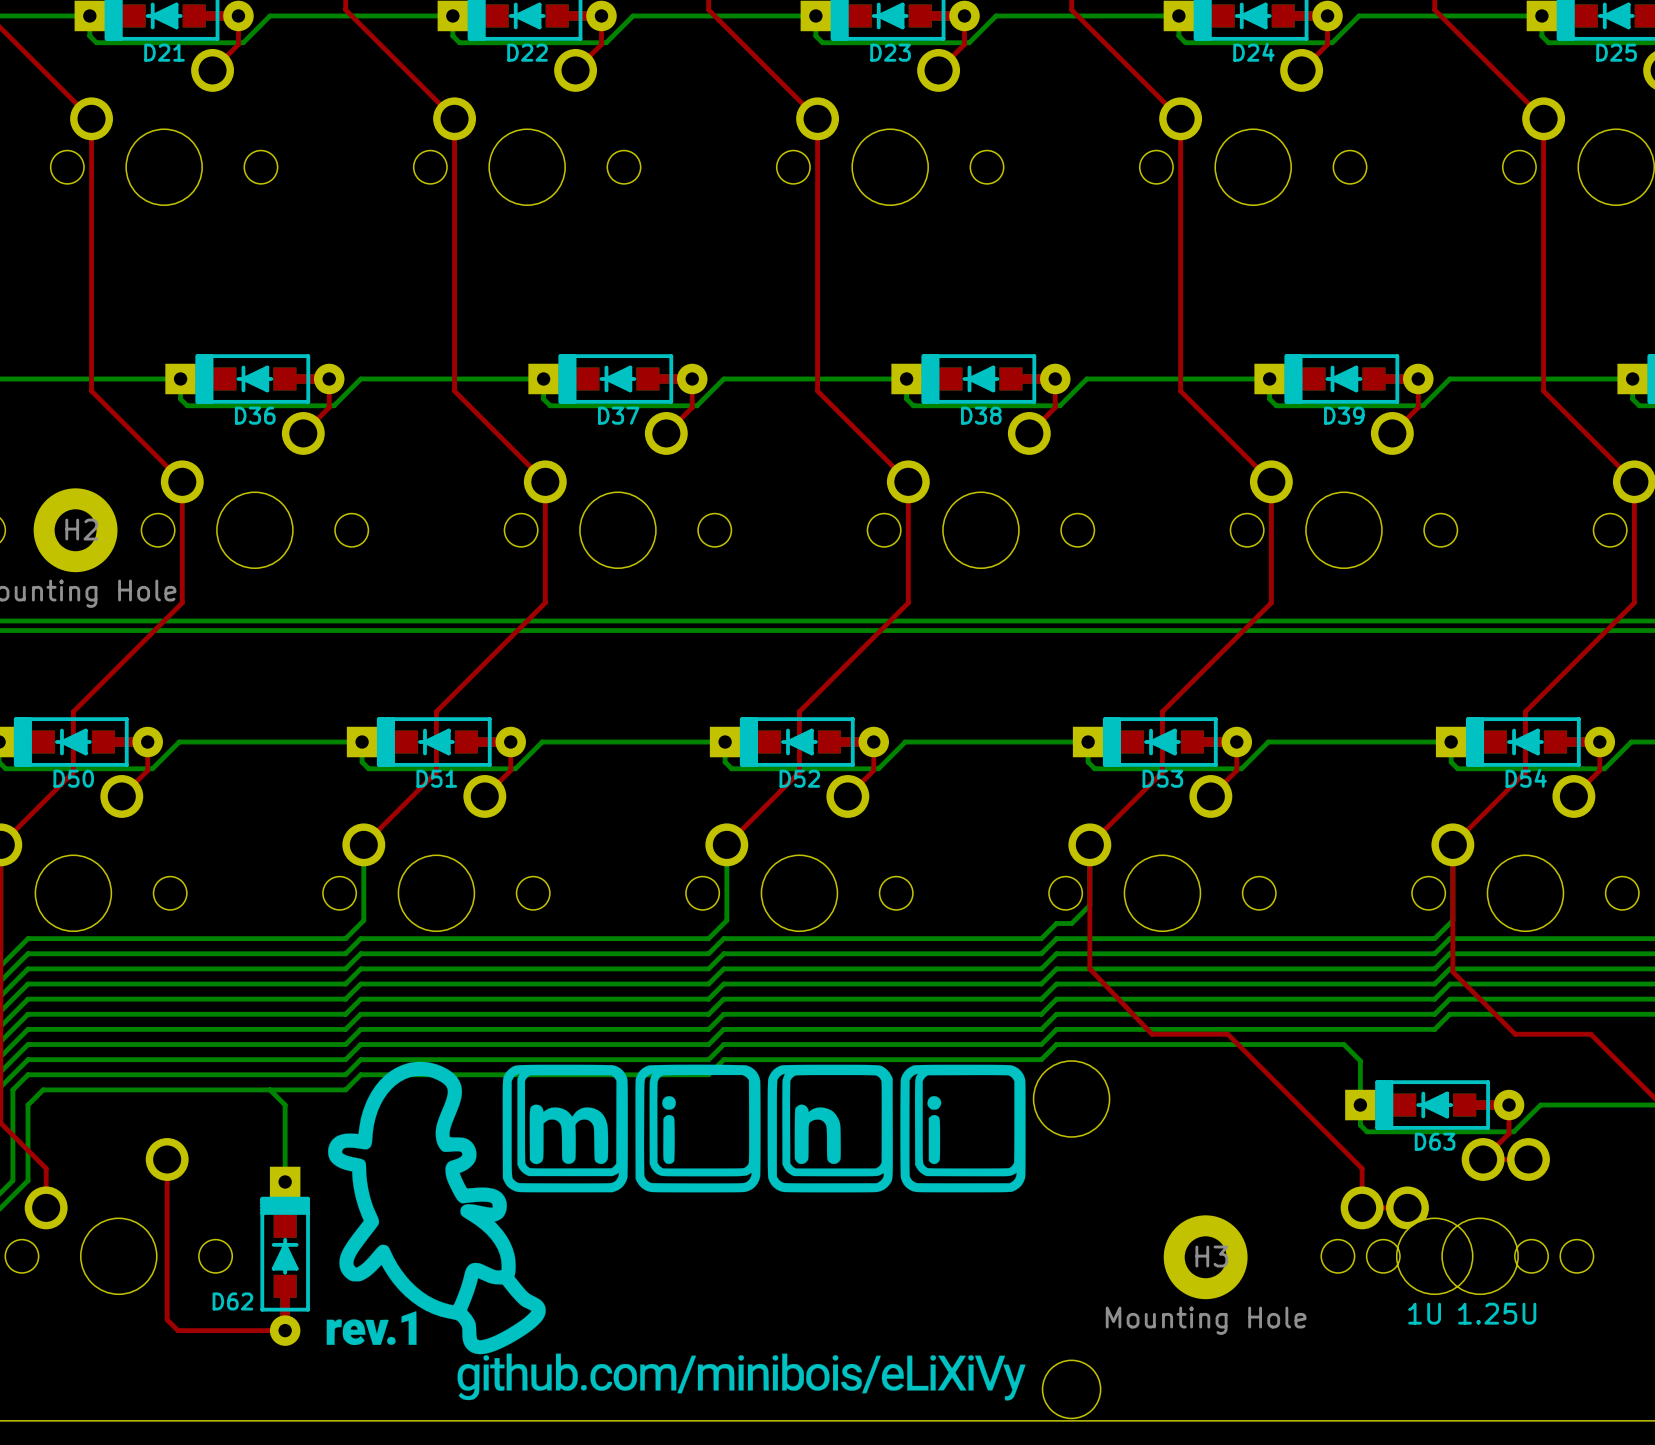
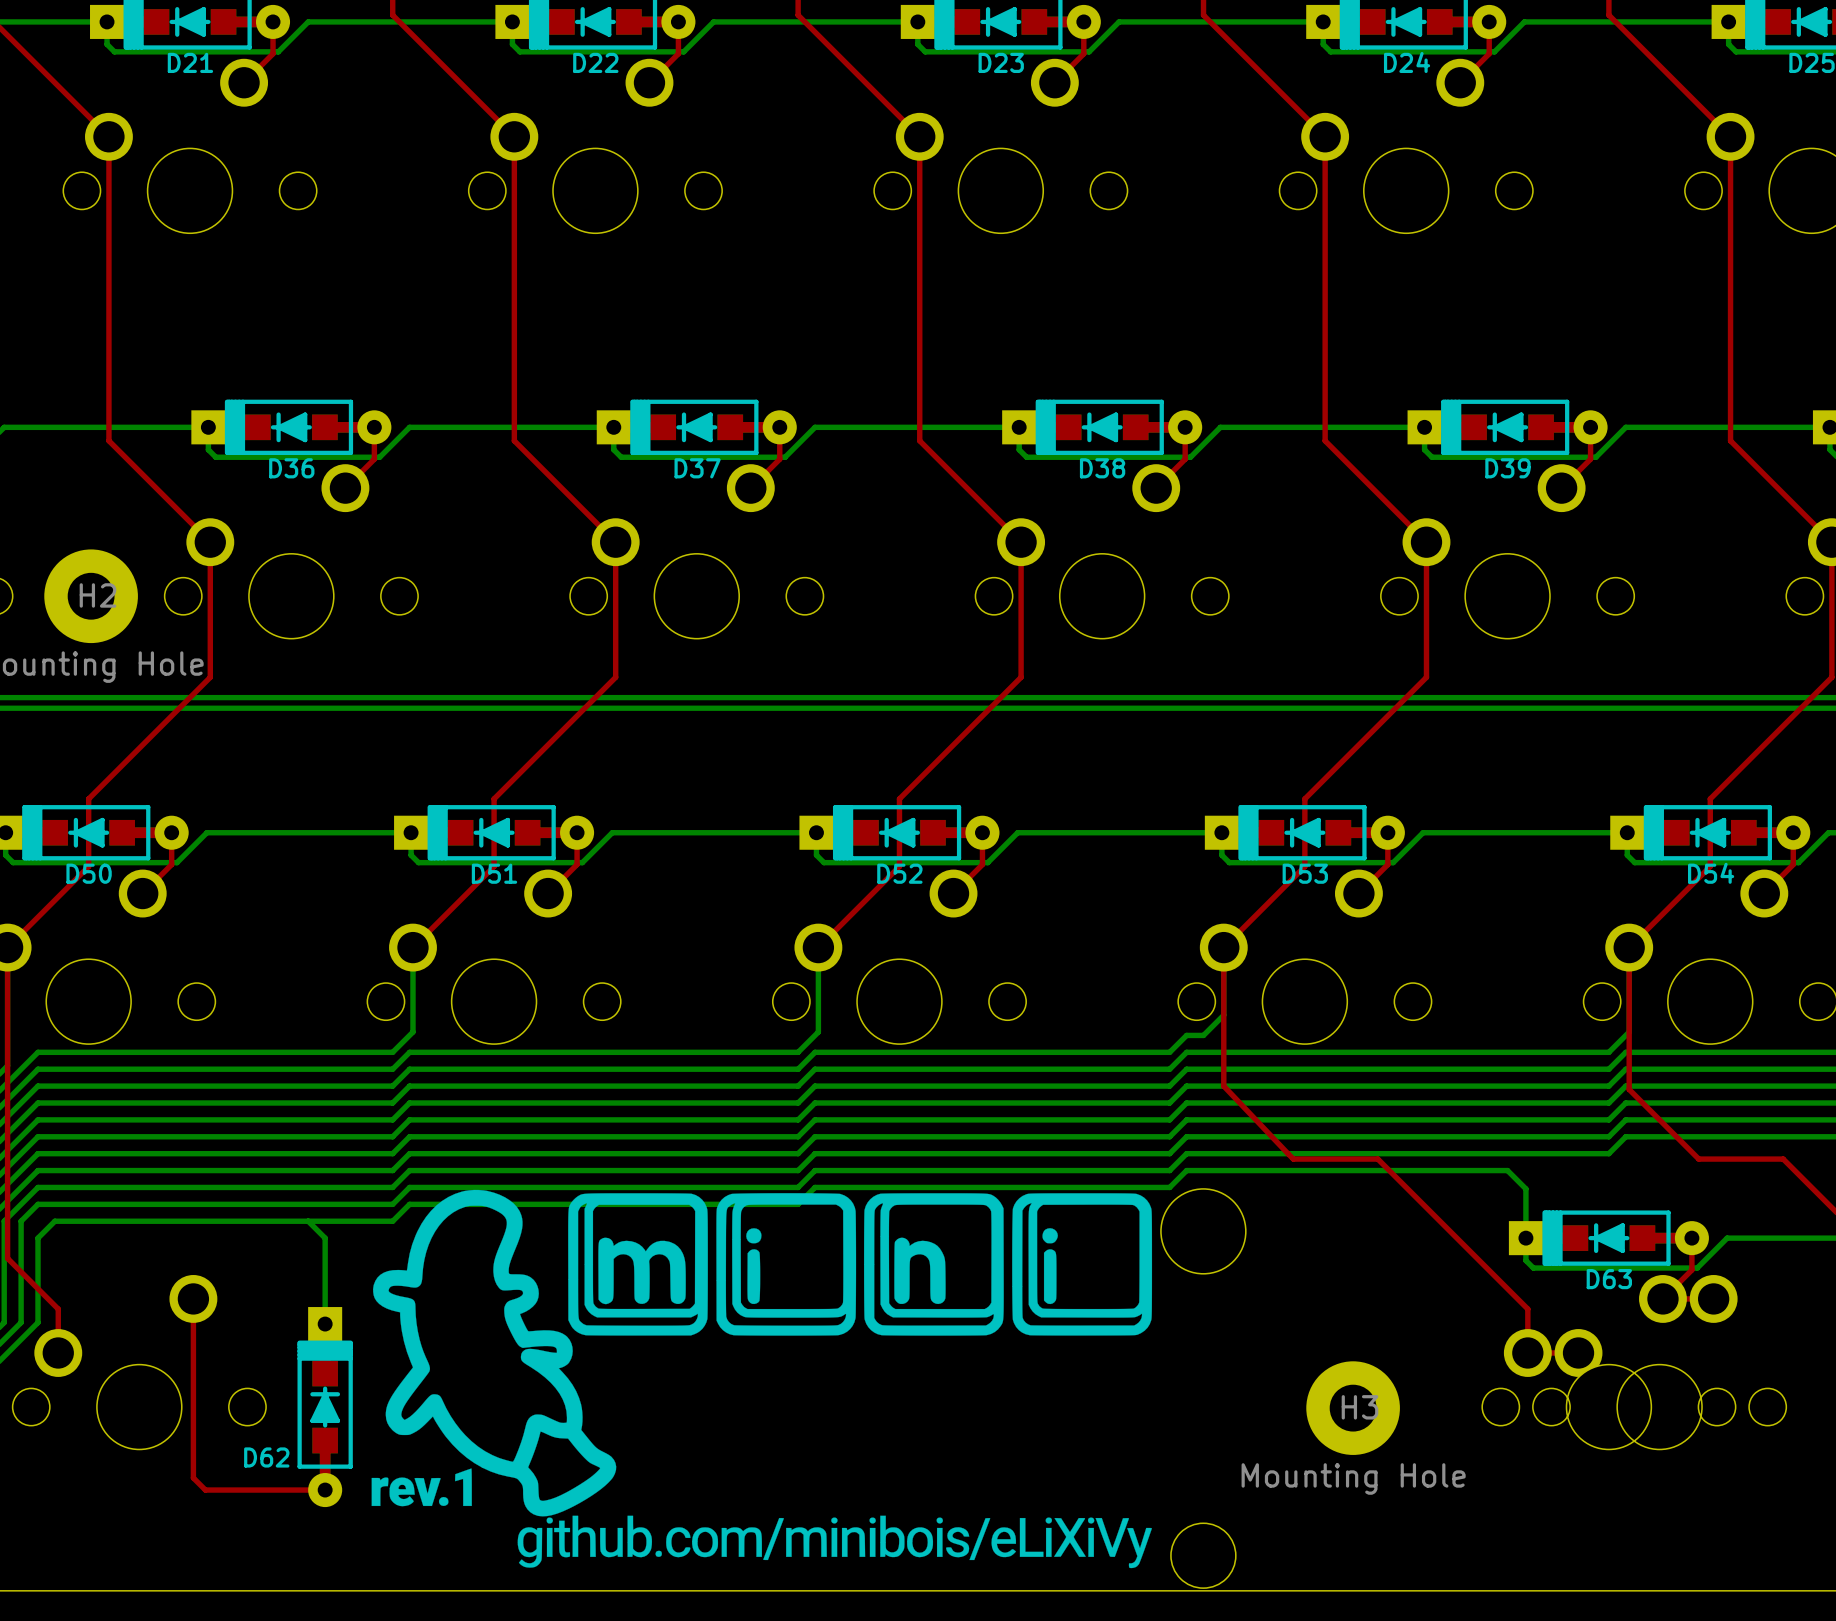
text: 1U (1424, 1313) -> none
text: 1.25U (1497, 1313) -> none

